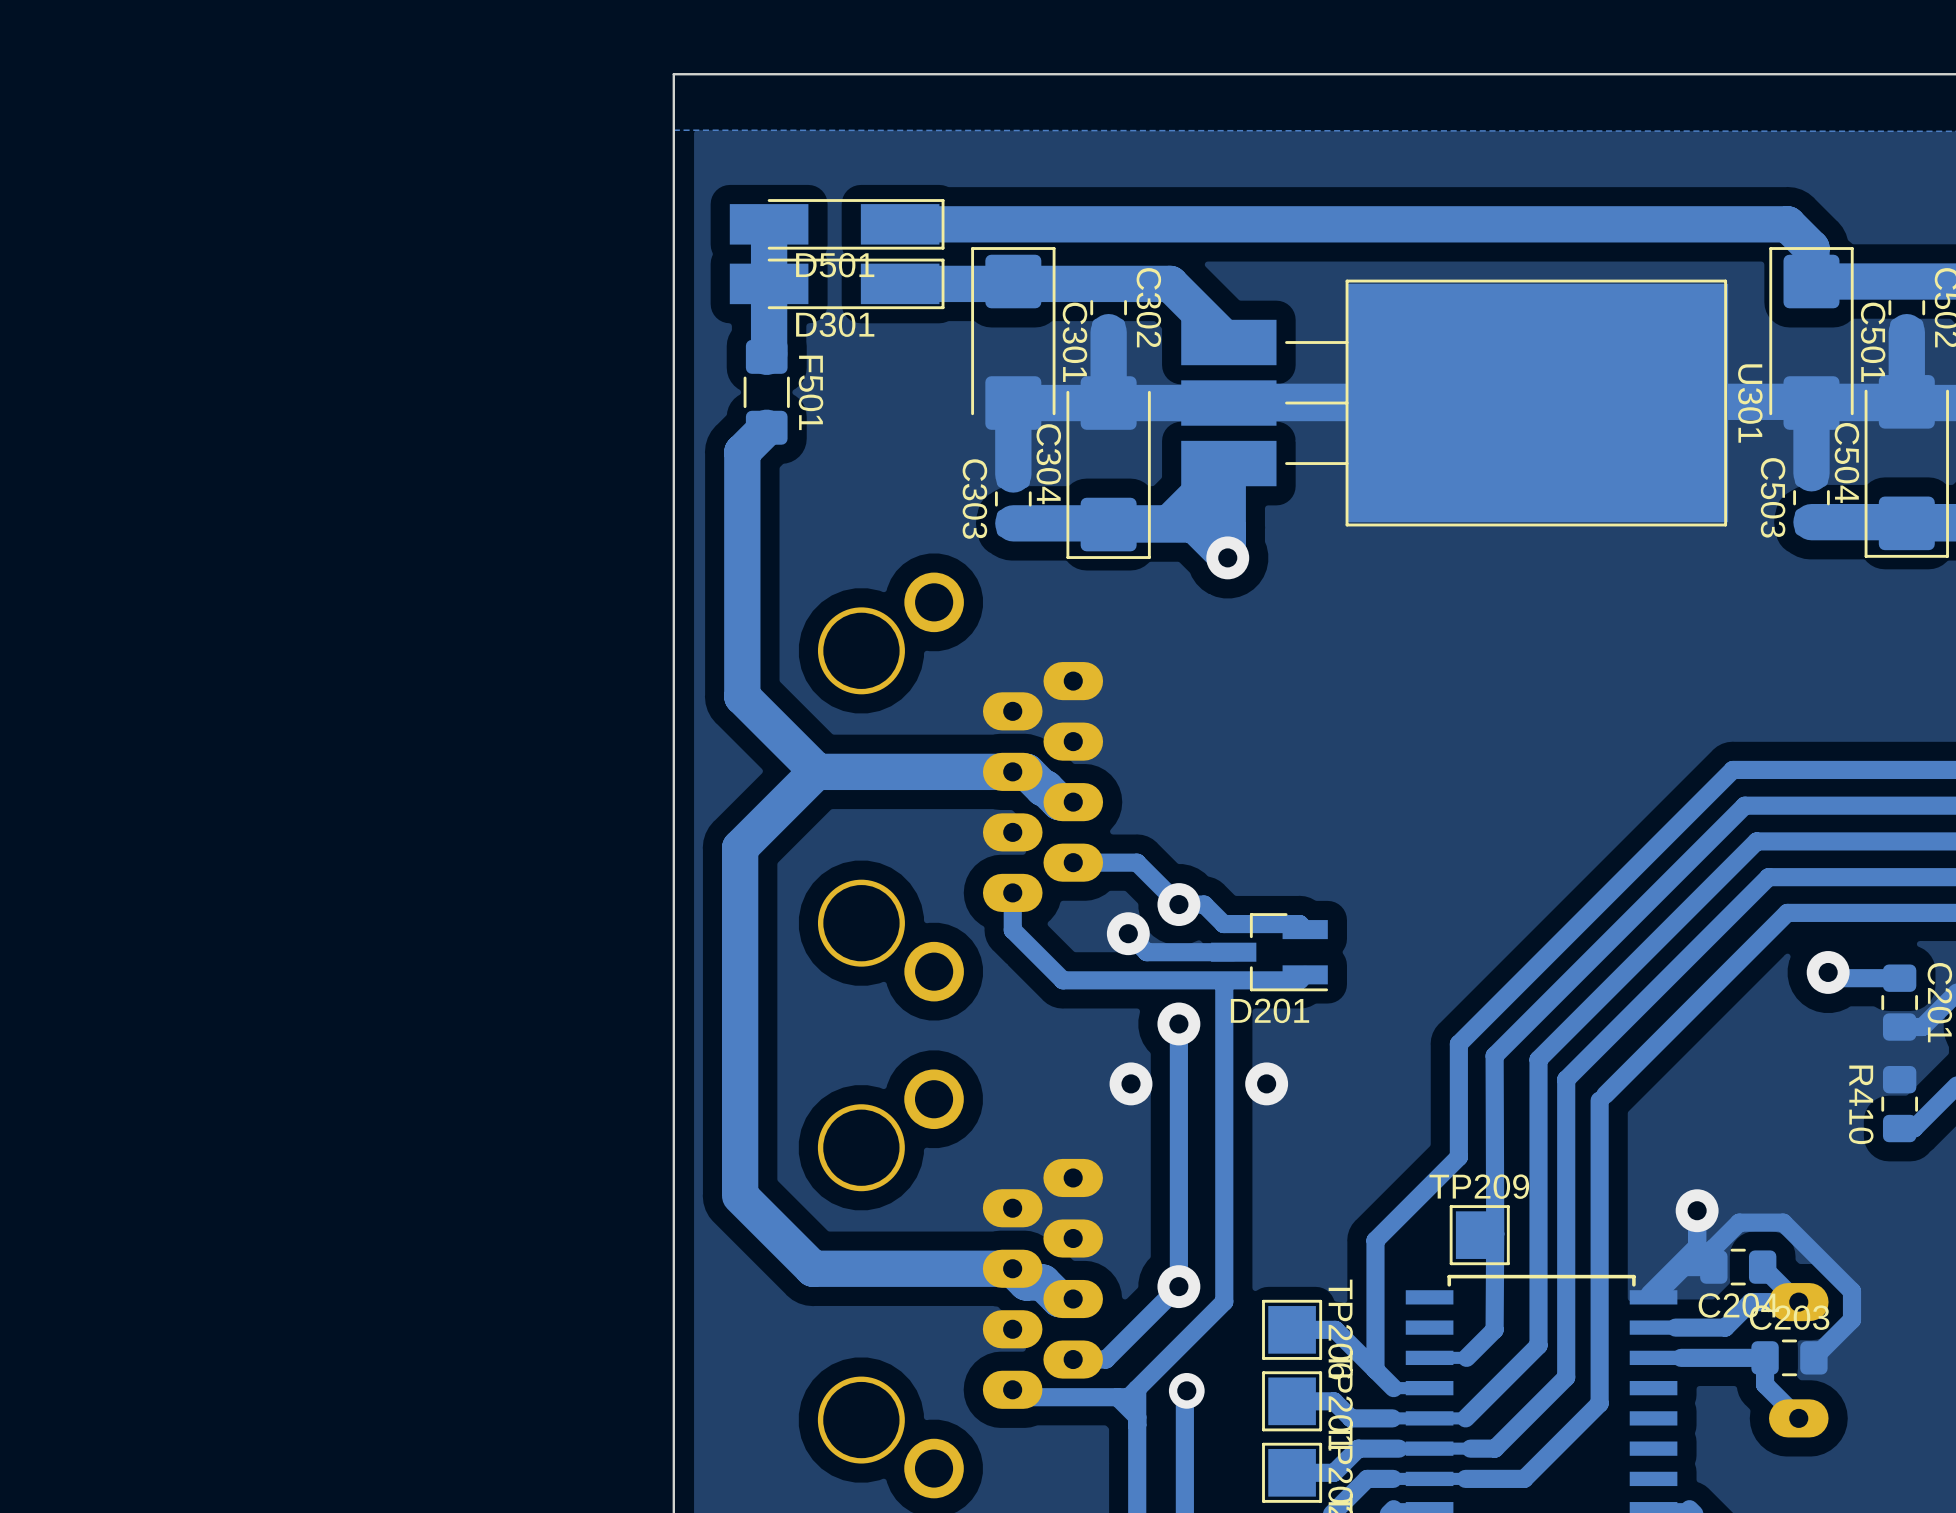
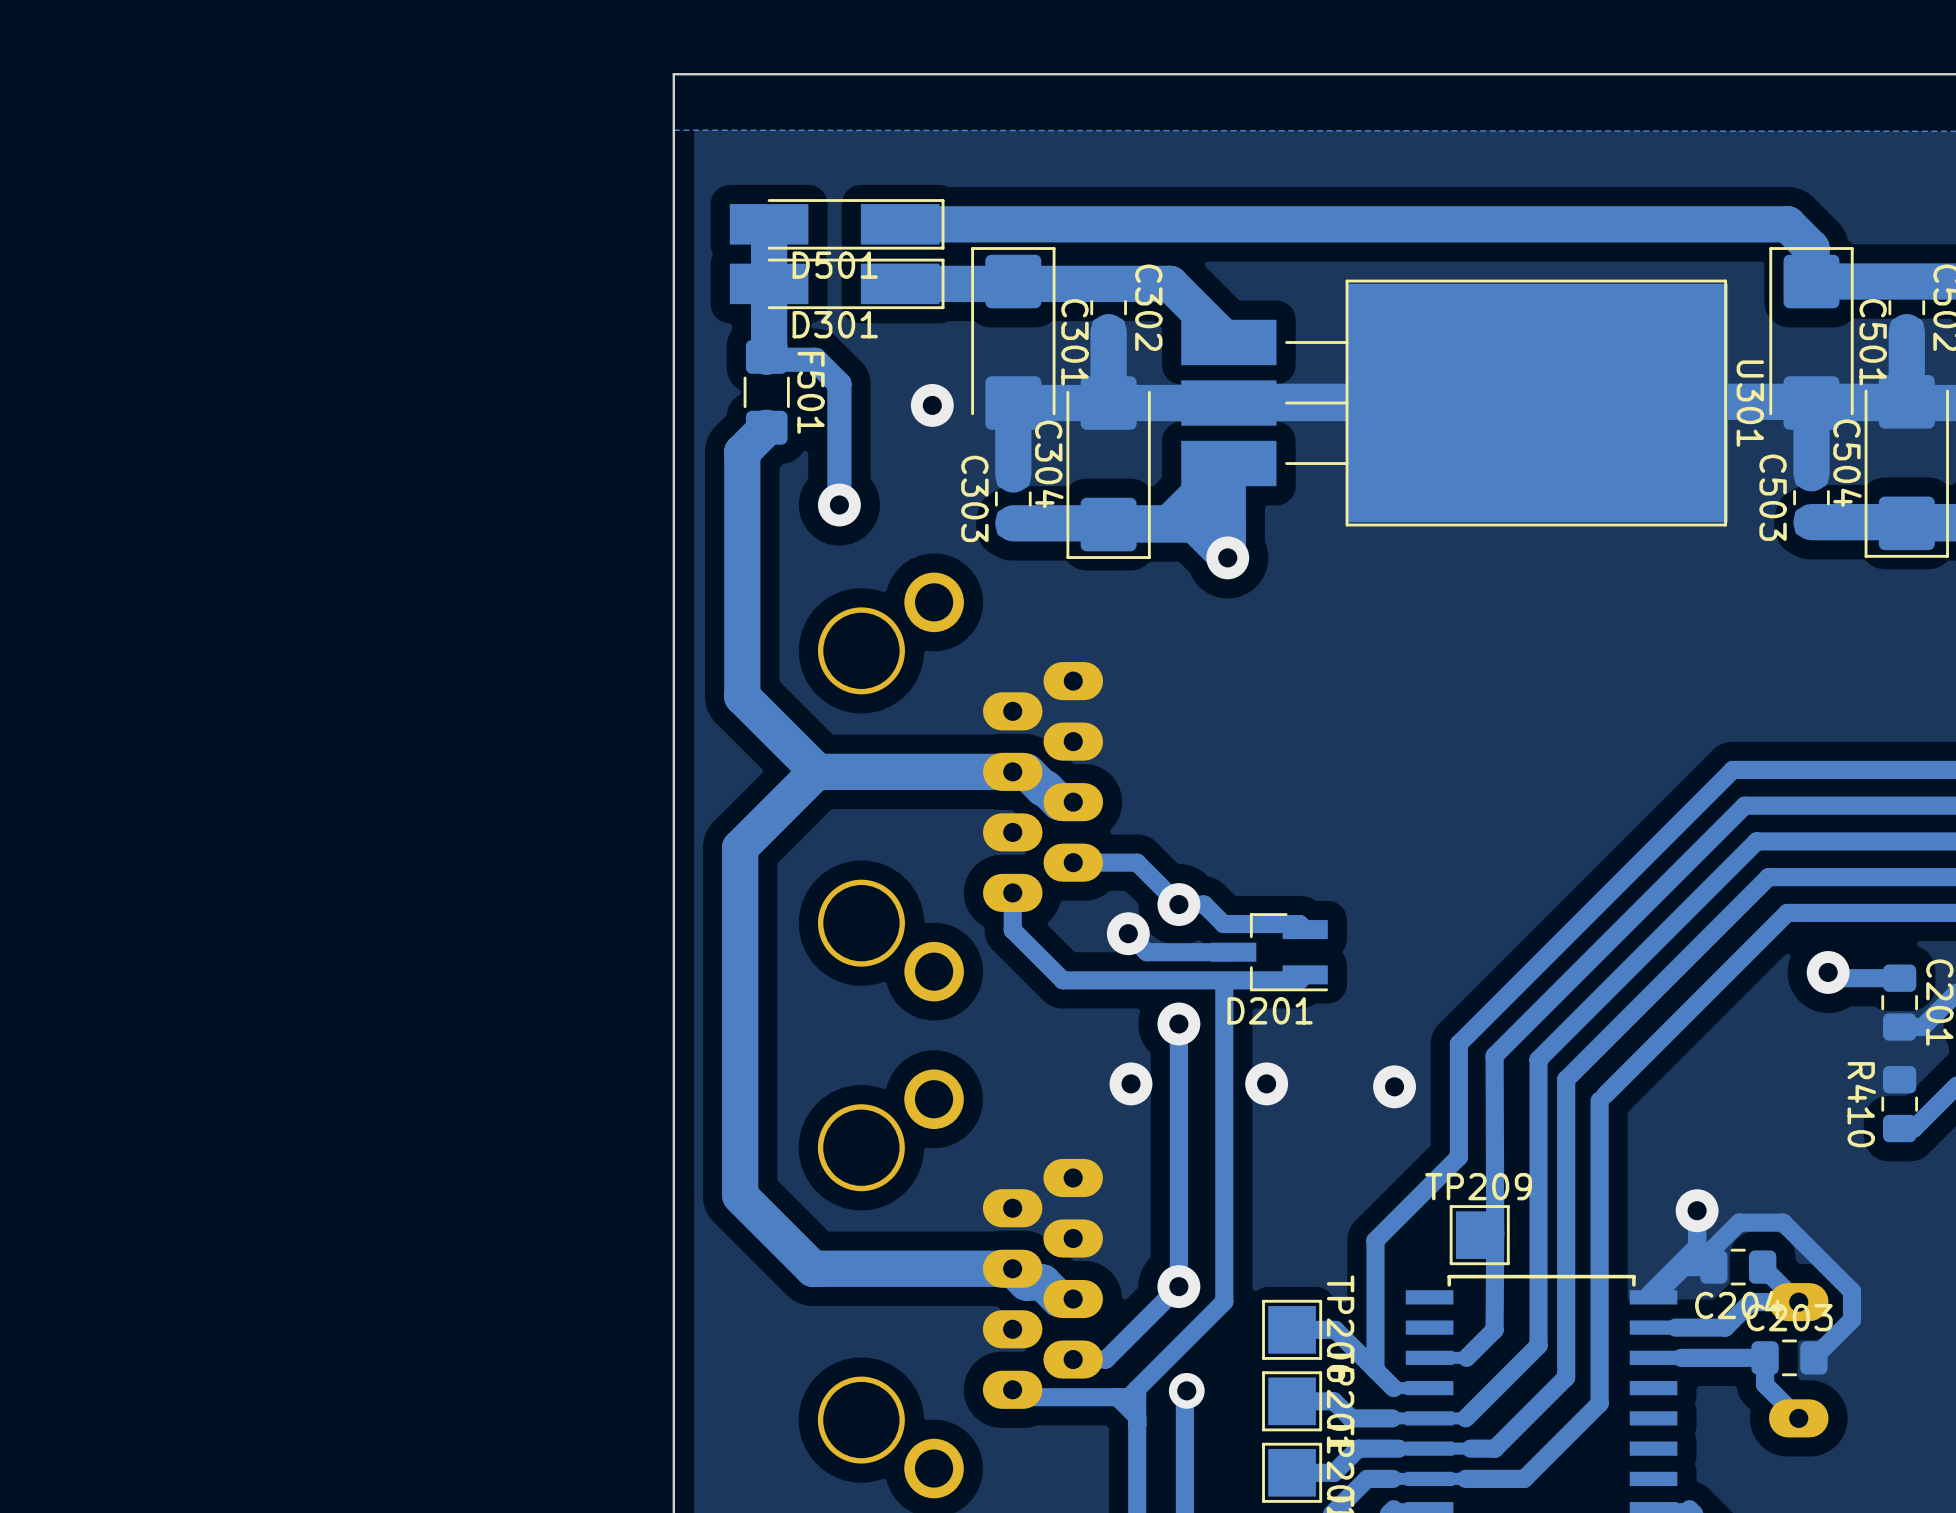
track: none -> (769, 354) (774, 359) (815, 359) (839, 383) (839, 505)
via: none -> (932, 405)
via: none -> (839, 505)
via: none -> (1394, 1086)

